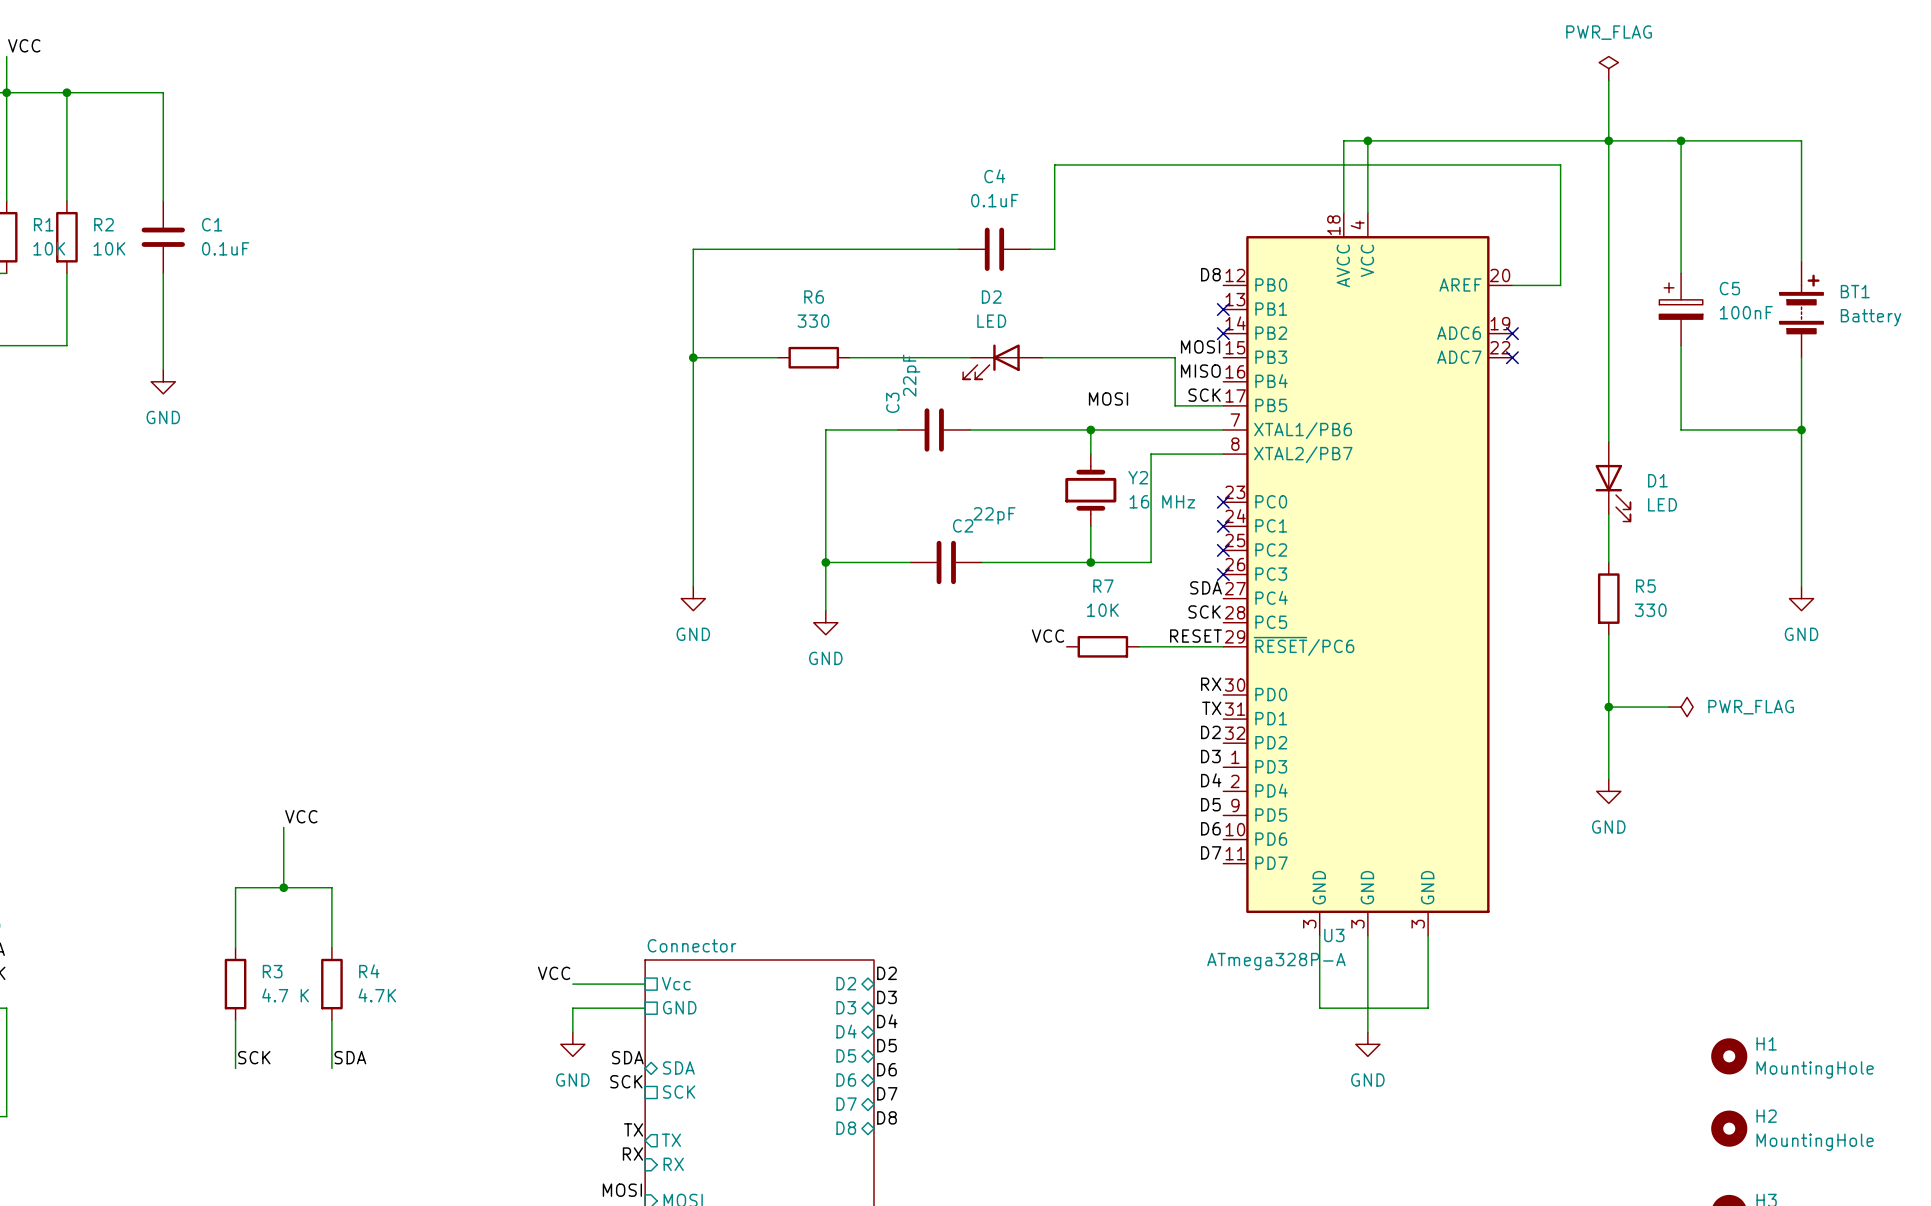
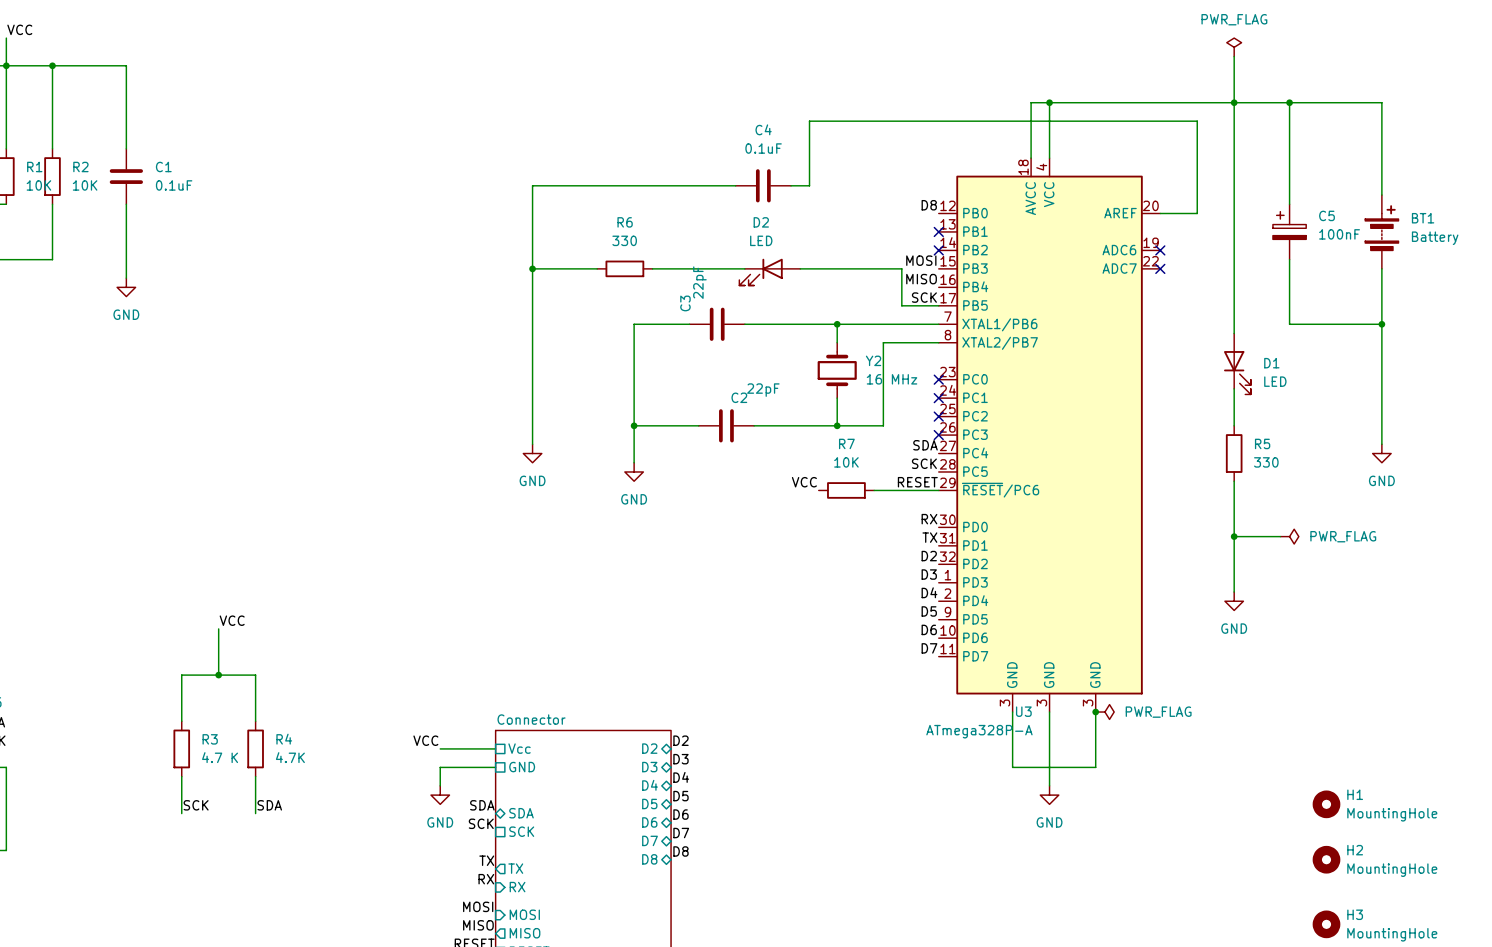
label: MOSI (1108, 398) -> none
junction: none -> (1095, 712)
power symbol: none -> PWR_FLAG (1104, 712)

